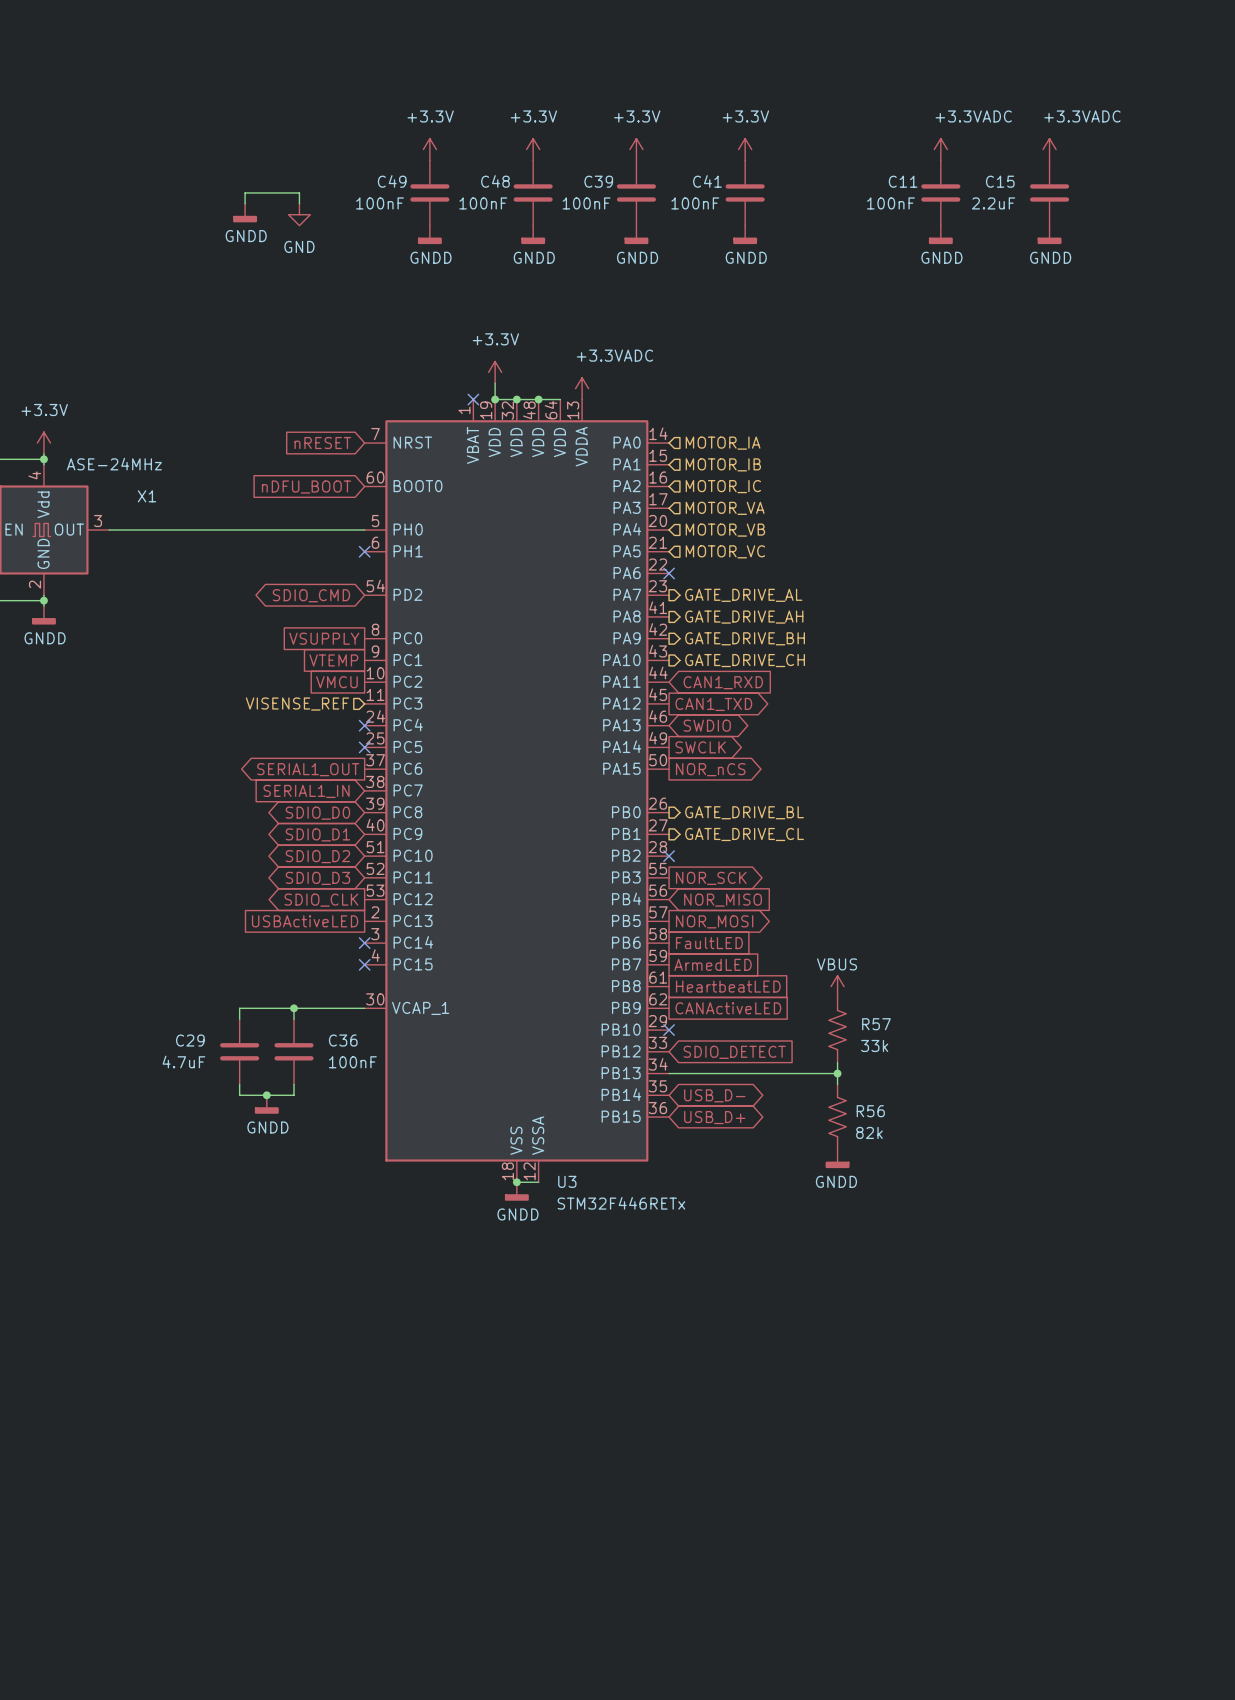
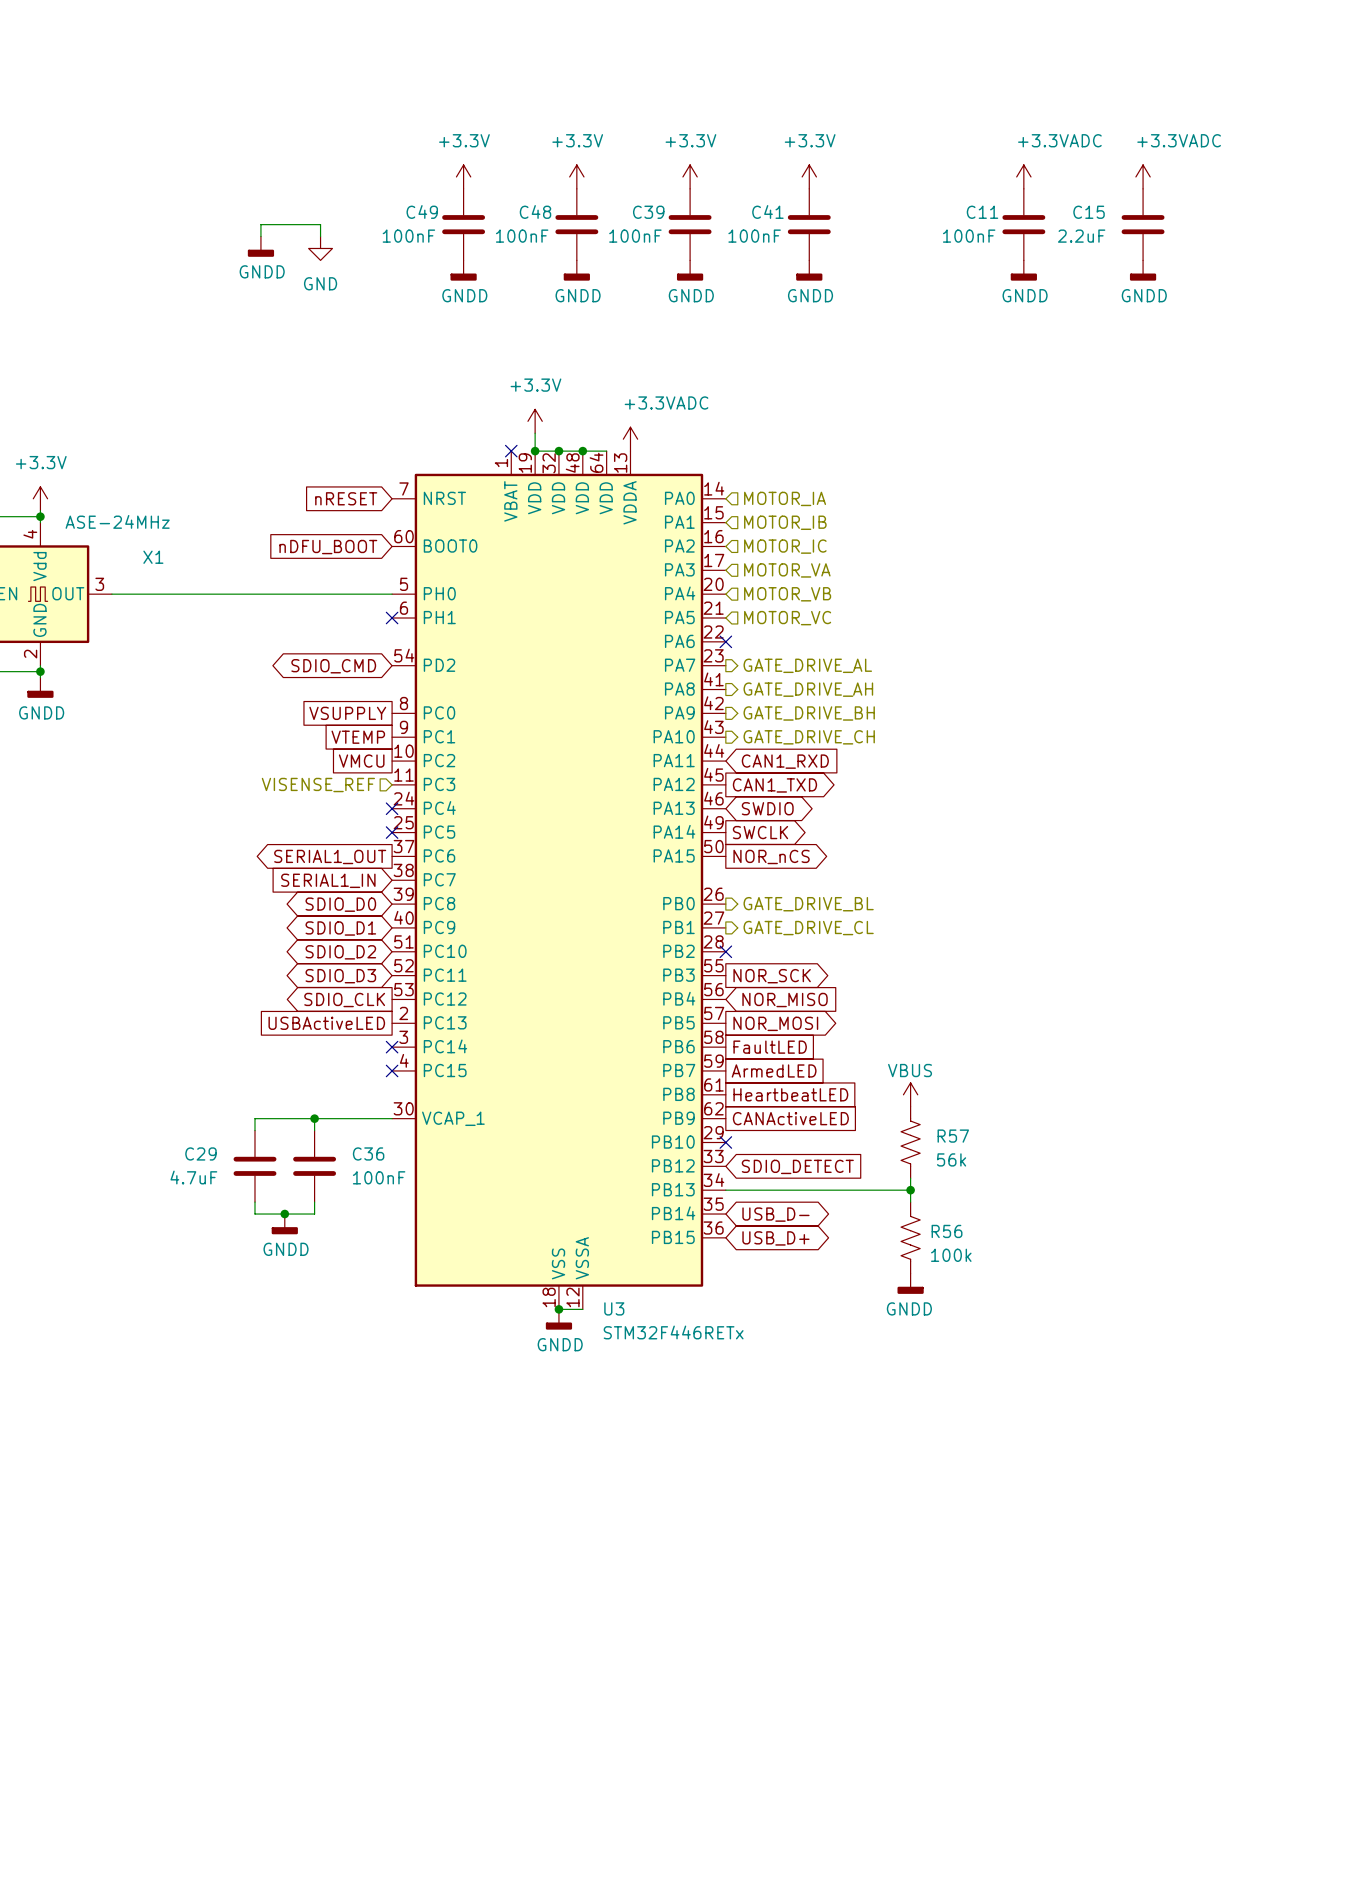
R57 value: 33k (874, 1045) -> 56k (951, 1159)
R56 value: 82k (869, 1132) -> 100k (951, 1255)

